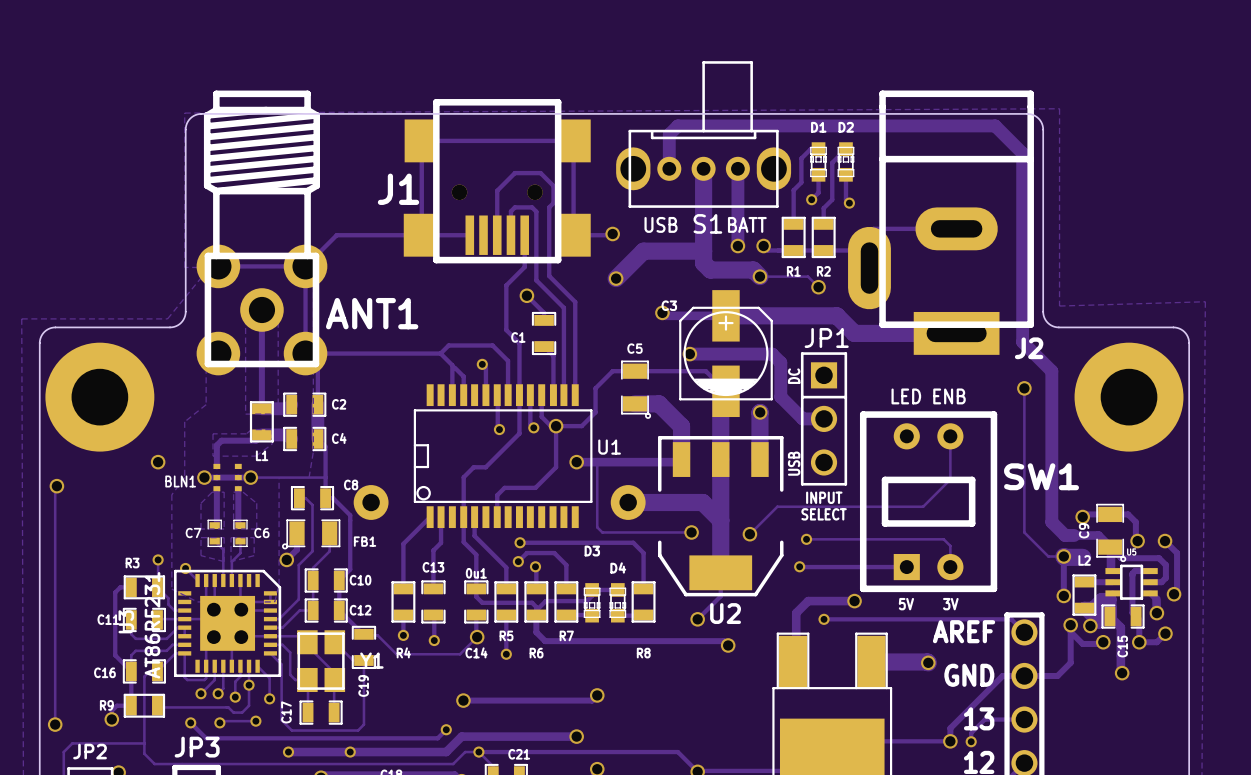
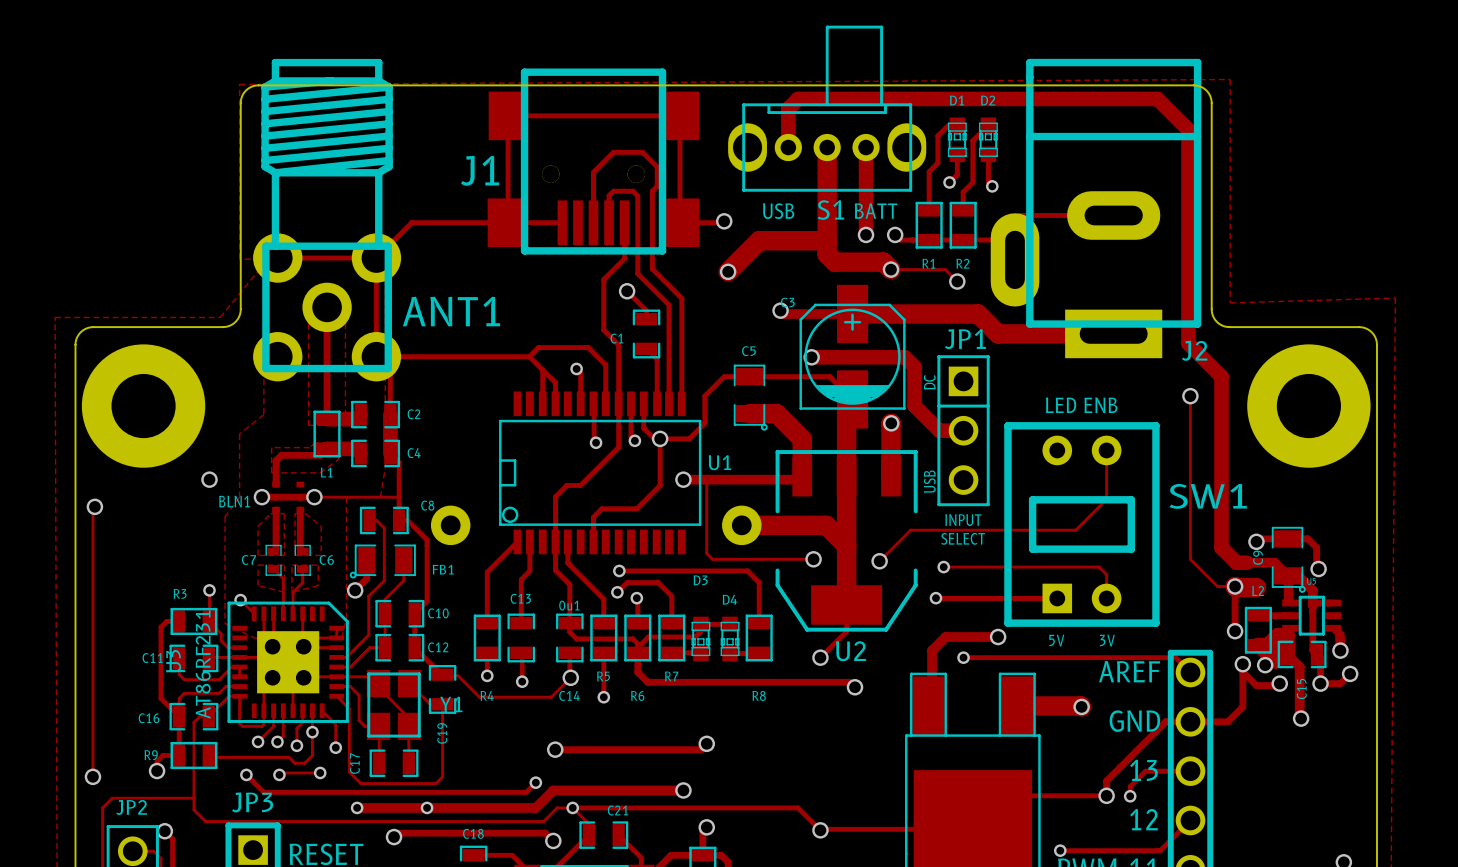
track: (1165, 541) (1177, 553) (1177, 591) (1174, 594) -> none
via: (1165, 541) -> none
track: (1110, 547) (1121, 558) (1159, 558) (1165, 565) (1165, 577) (1161, 582) (1150, 582) -> (1287, 575) (1298, 575) (1312, 590) (1312, 605)
via: (1174, 594) -> none

